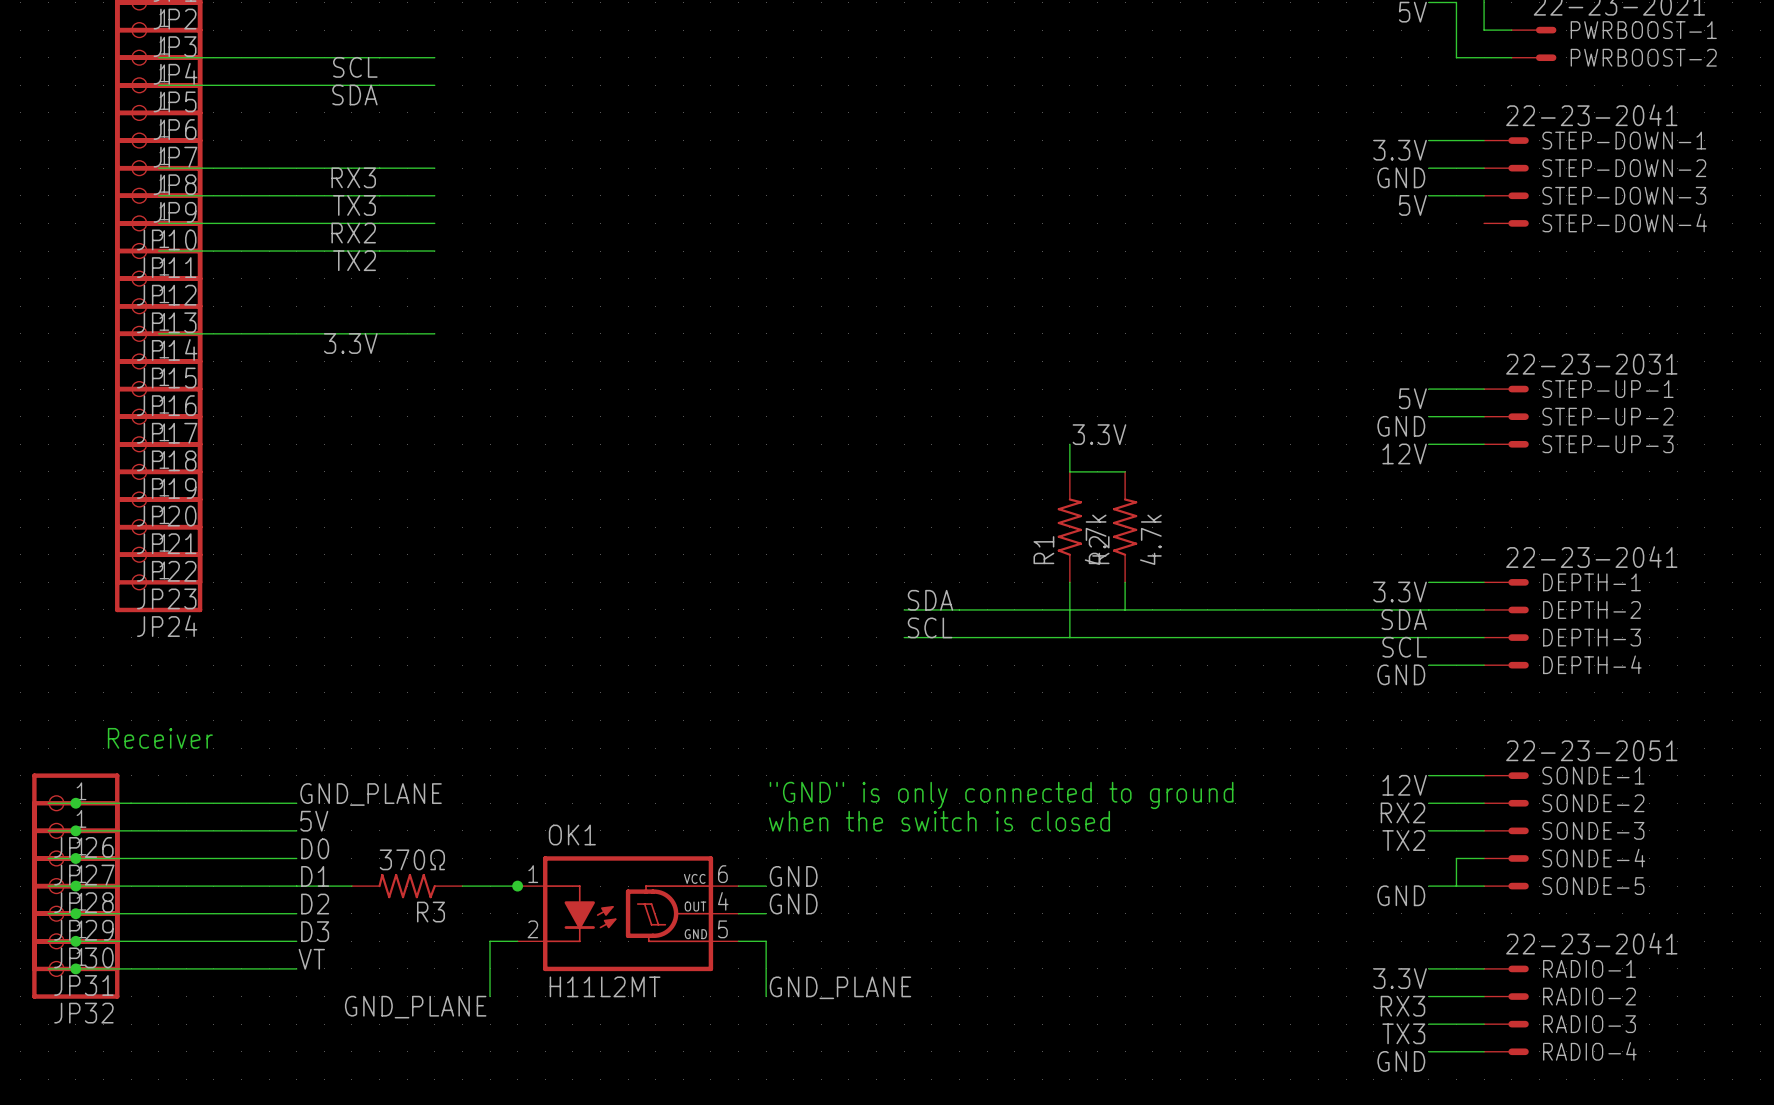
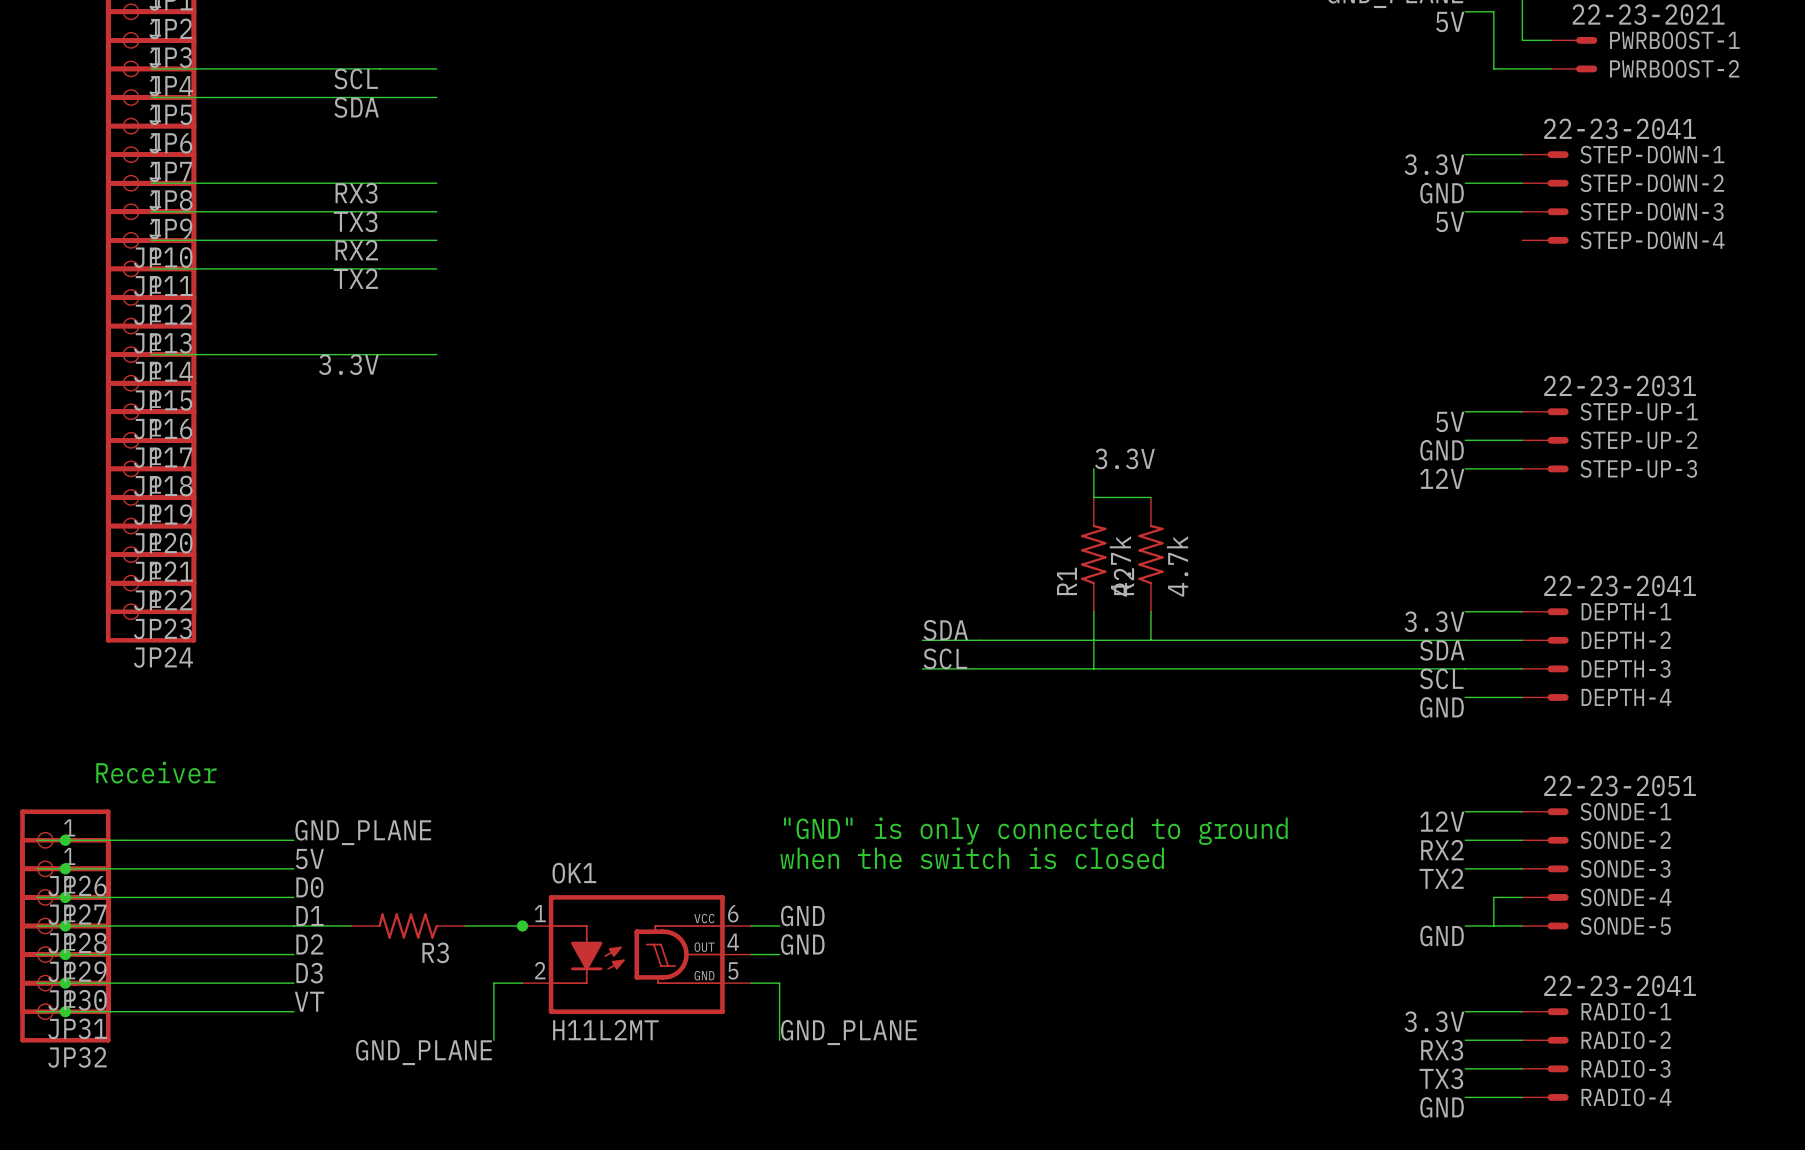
R3 value: 370Ω (412, 859) -> none

